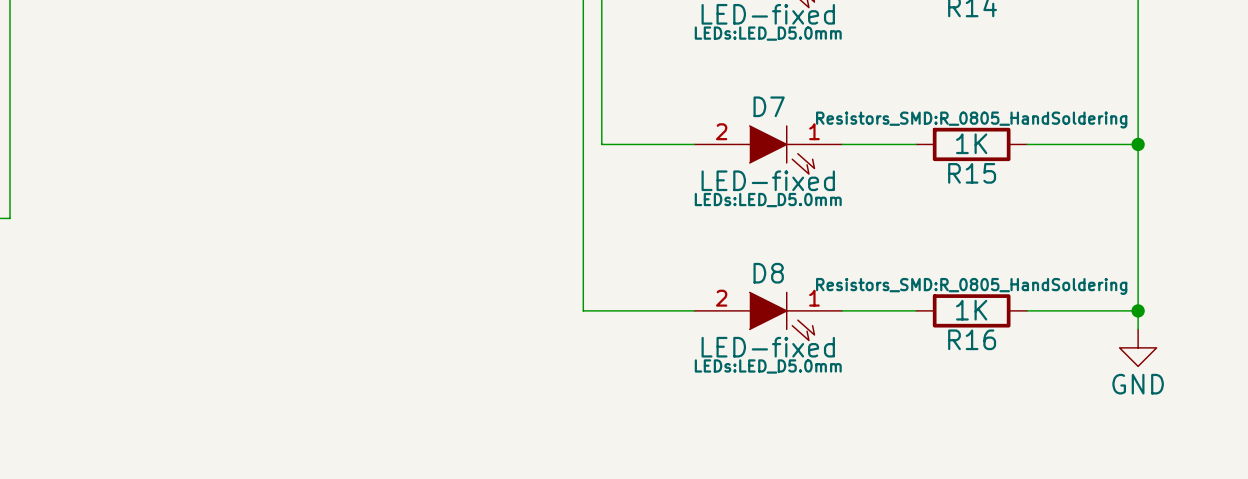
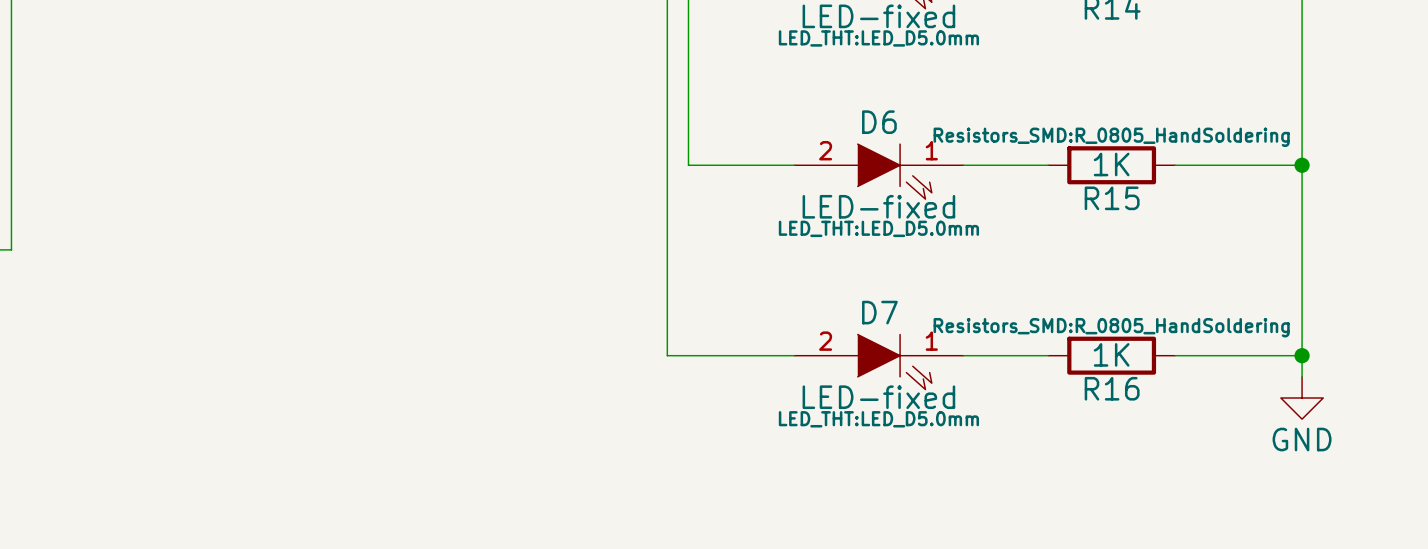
part text: LEDs:LED_D5.0mm (768, 33) -> LED_THT:LED_D5.0mm (878, 38)
D7 name: D7 (769, 106) -> D6 (879, 122)
D7 text: LEDs:LED_D5.0mm (768, 200) -> LED_THT:LED_D5.0mm (878, 228)
D8 name: D8 (768, 273) -> D7 (879, 312)
D8 text: LEDs:LED_D5.0mm (768, 366) -> LED_THT:LED_D5.0mm (878, 419)

